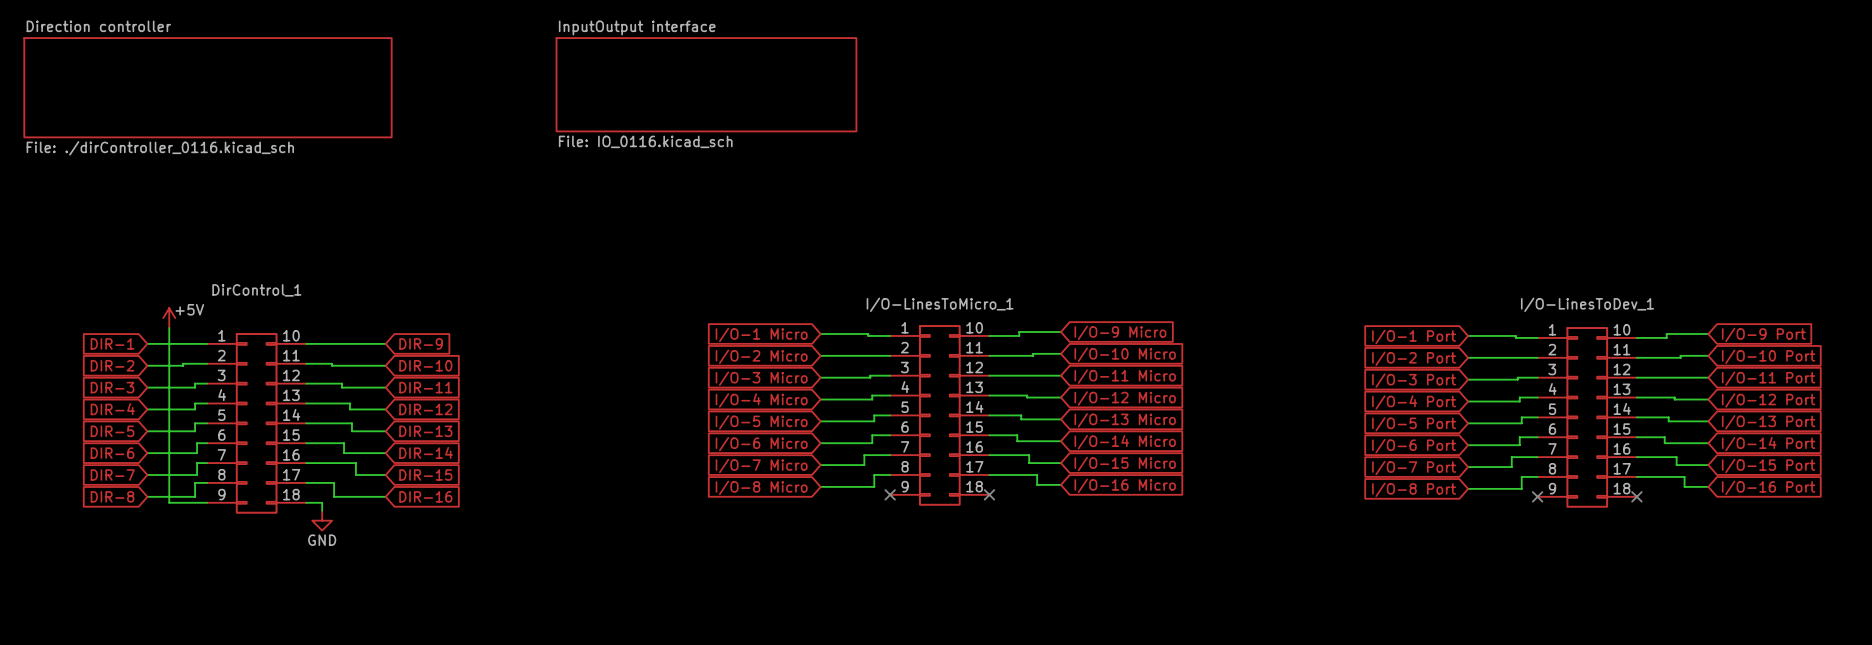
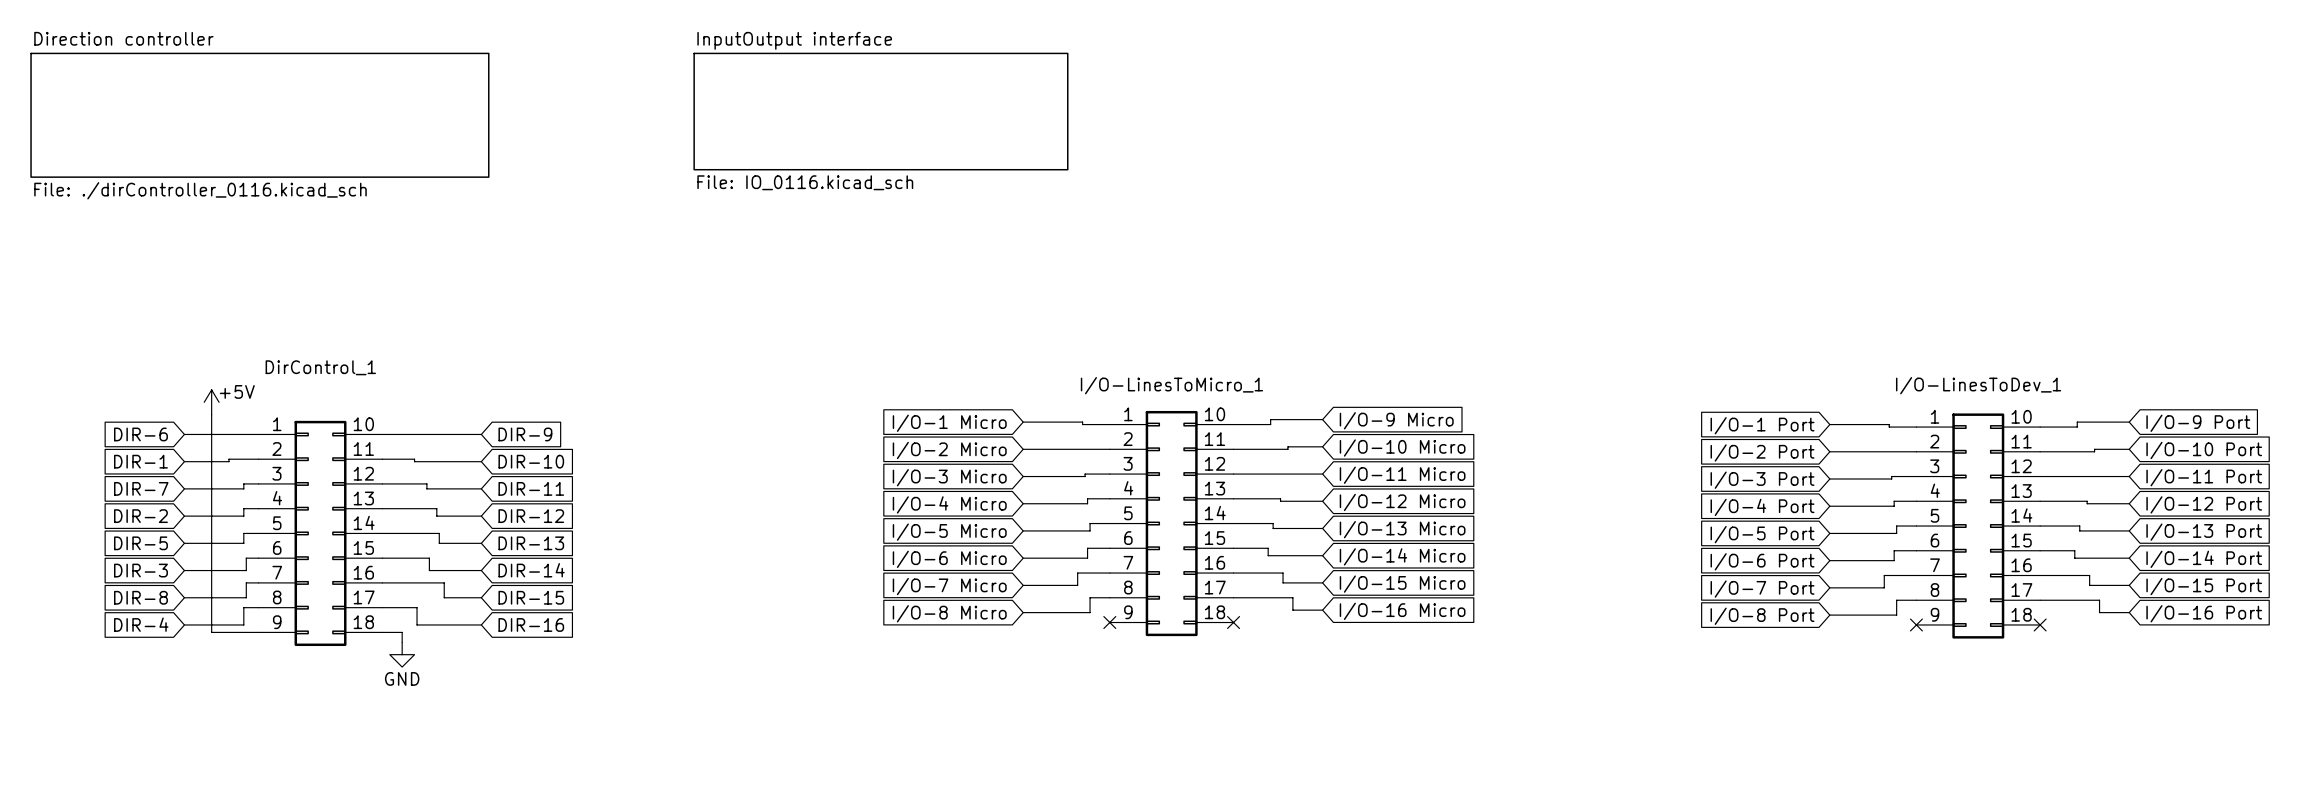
global label: DIR-1 (112, 343) -> DIR-6 (140, 434)
global label: DIR-2 (112, 365) -> DIR-1 (140, 461)
global label: DIR-3 (112, 387) -> DIR-7 (141, 488)
global label: DIR-4 (112, 409) -> DIR-2 (140, 516)
global label: DIR-6 (112, 453) -> DIR-3 (140, 570)
global label: DIR-7 (112, 474) -> DIR-8 (140, 597)
global label: DIR-8 (112, 496) -> DIR-4 (141, 624)

